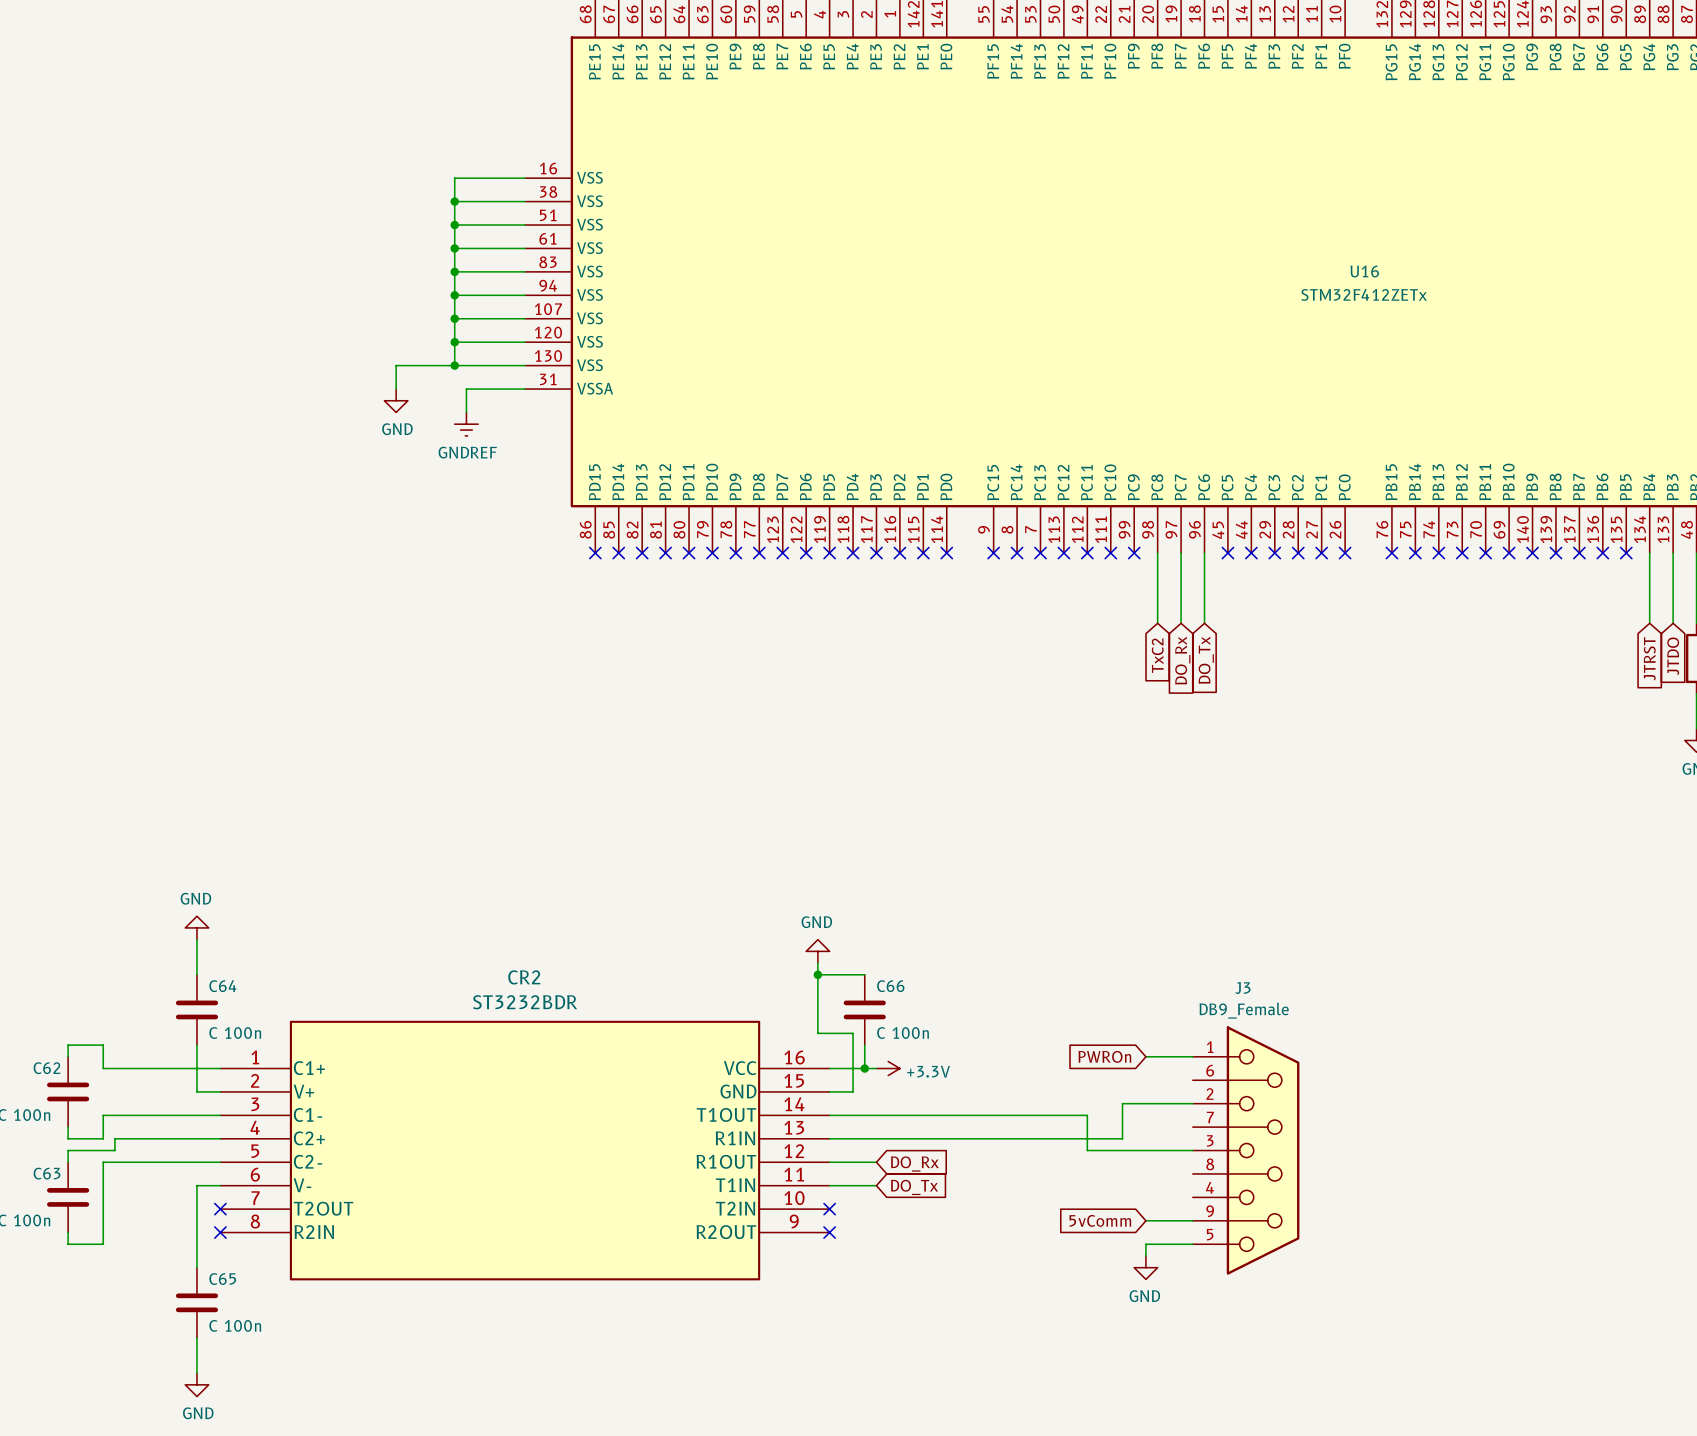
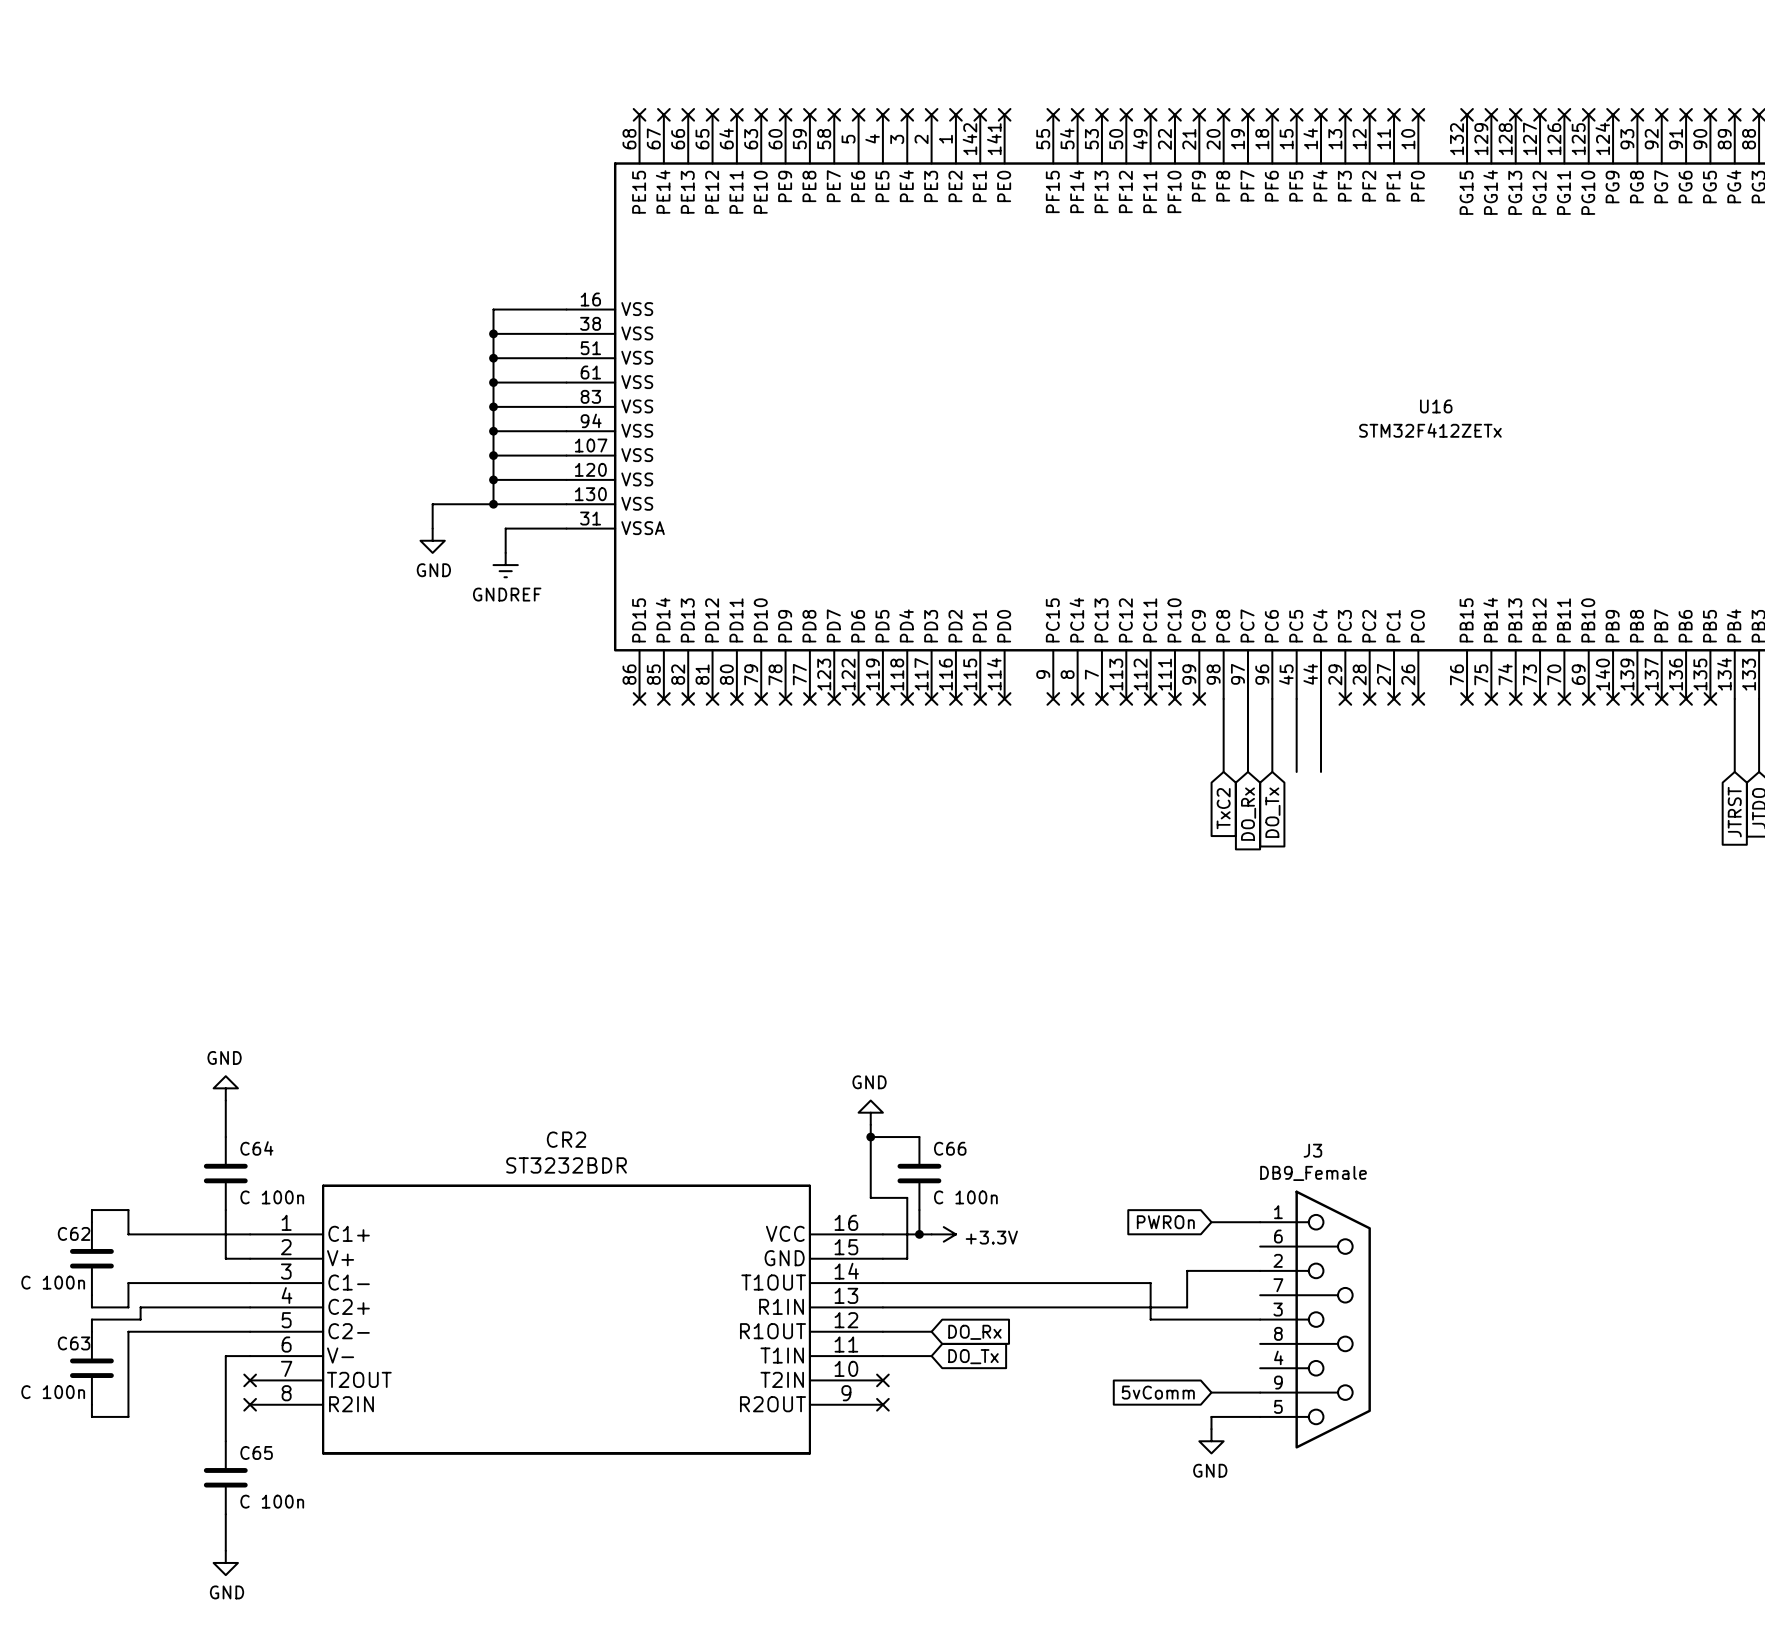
wire: none -> (1296, 698) (1296, 771)
no-connect mark: (1227, 553) -> none
wire: none -> (1321, 698) (1321, 771)
no-connect mark: (1251, 553) -> none

